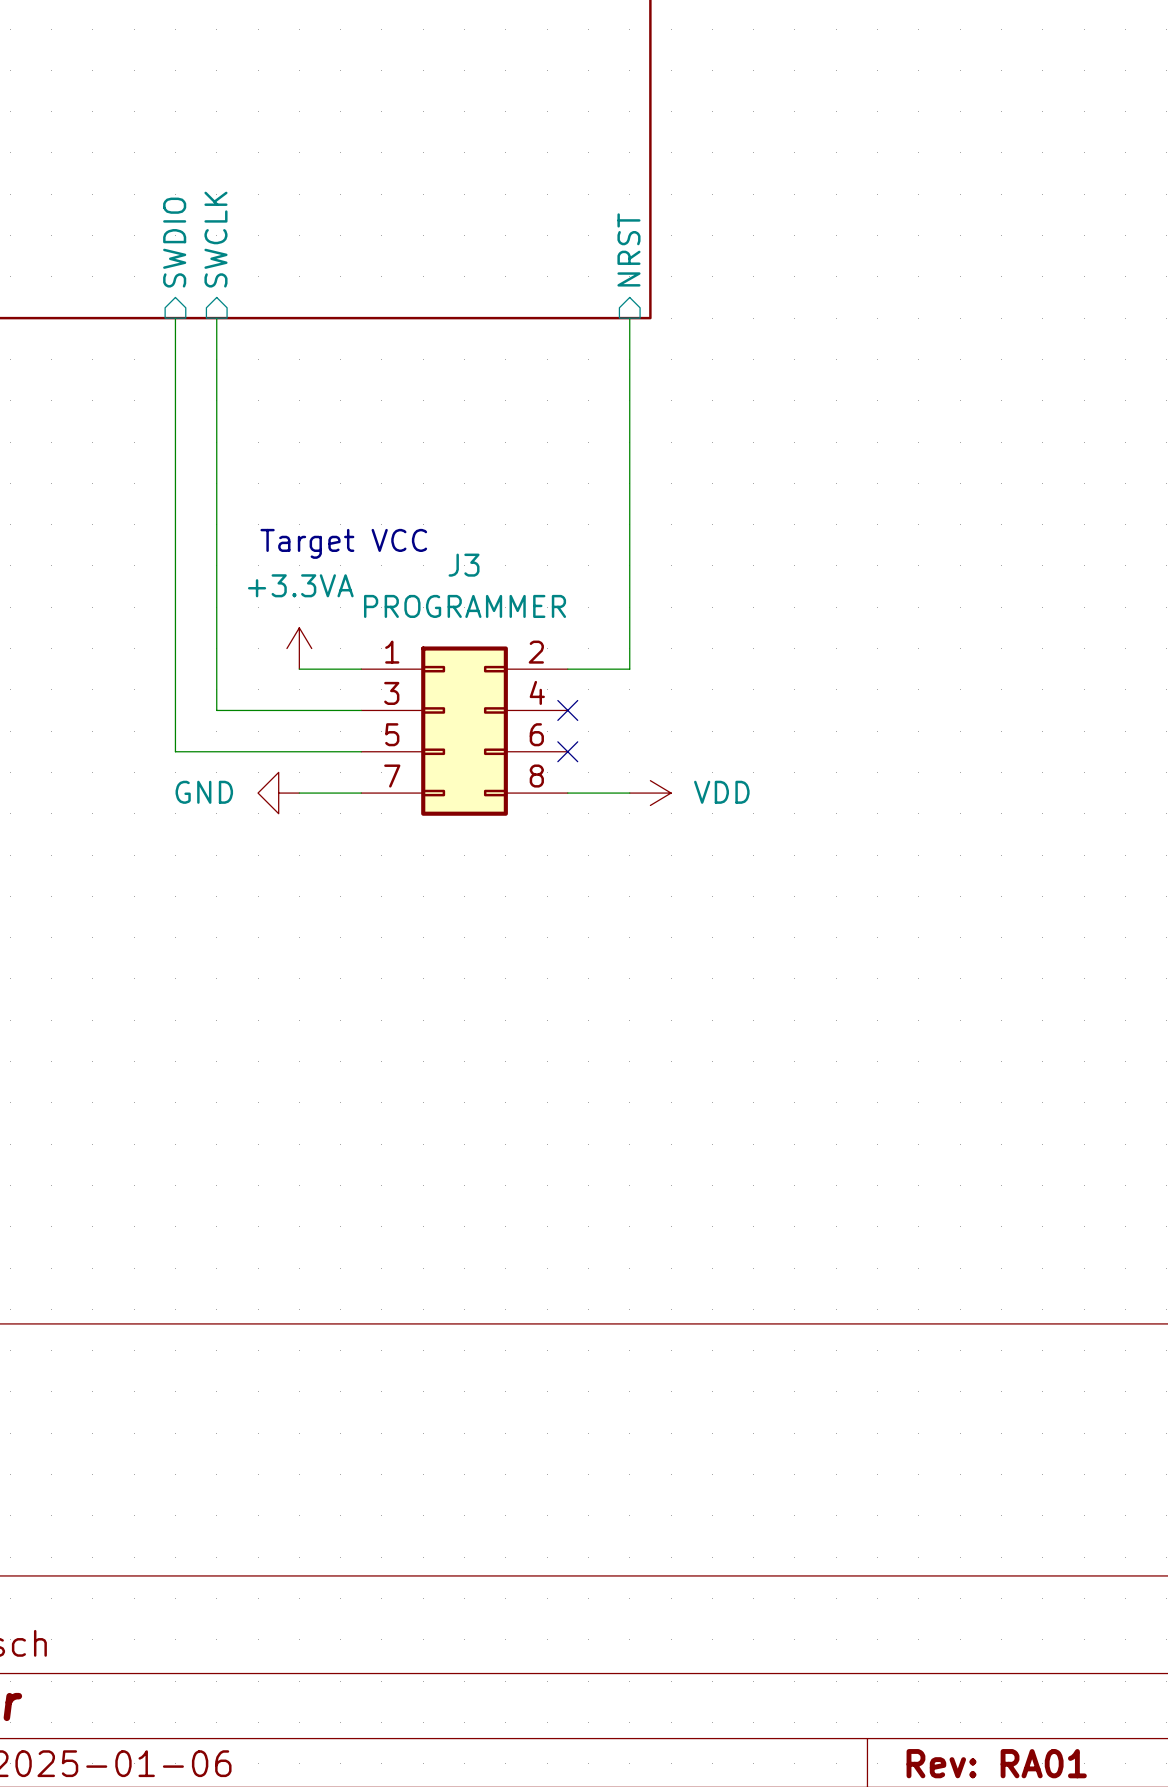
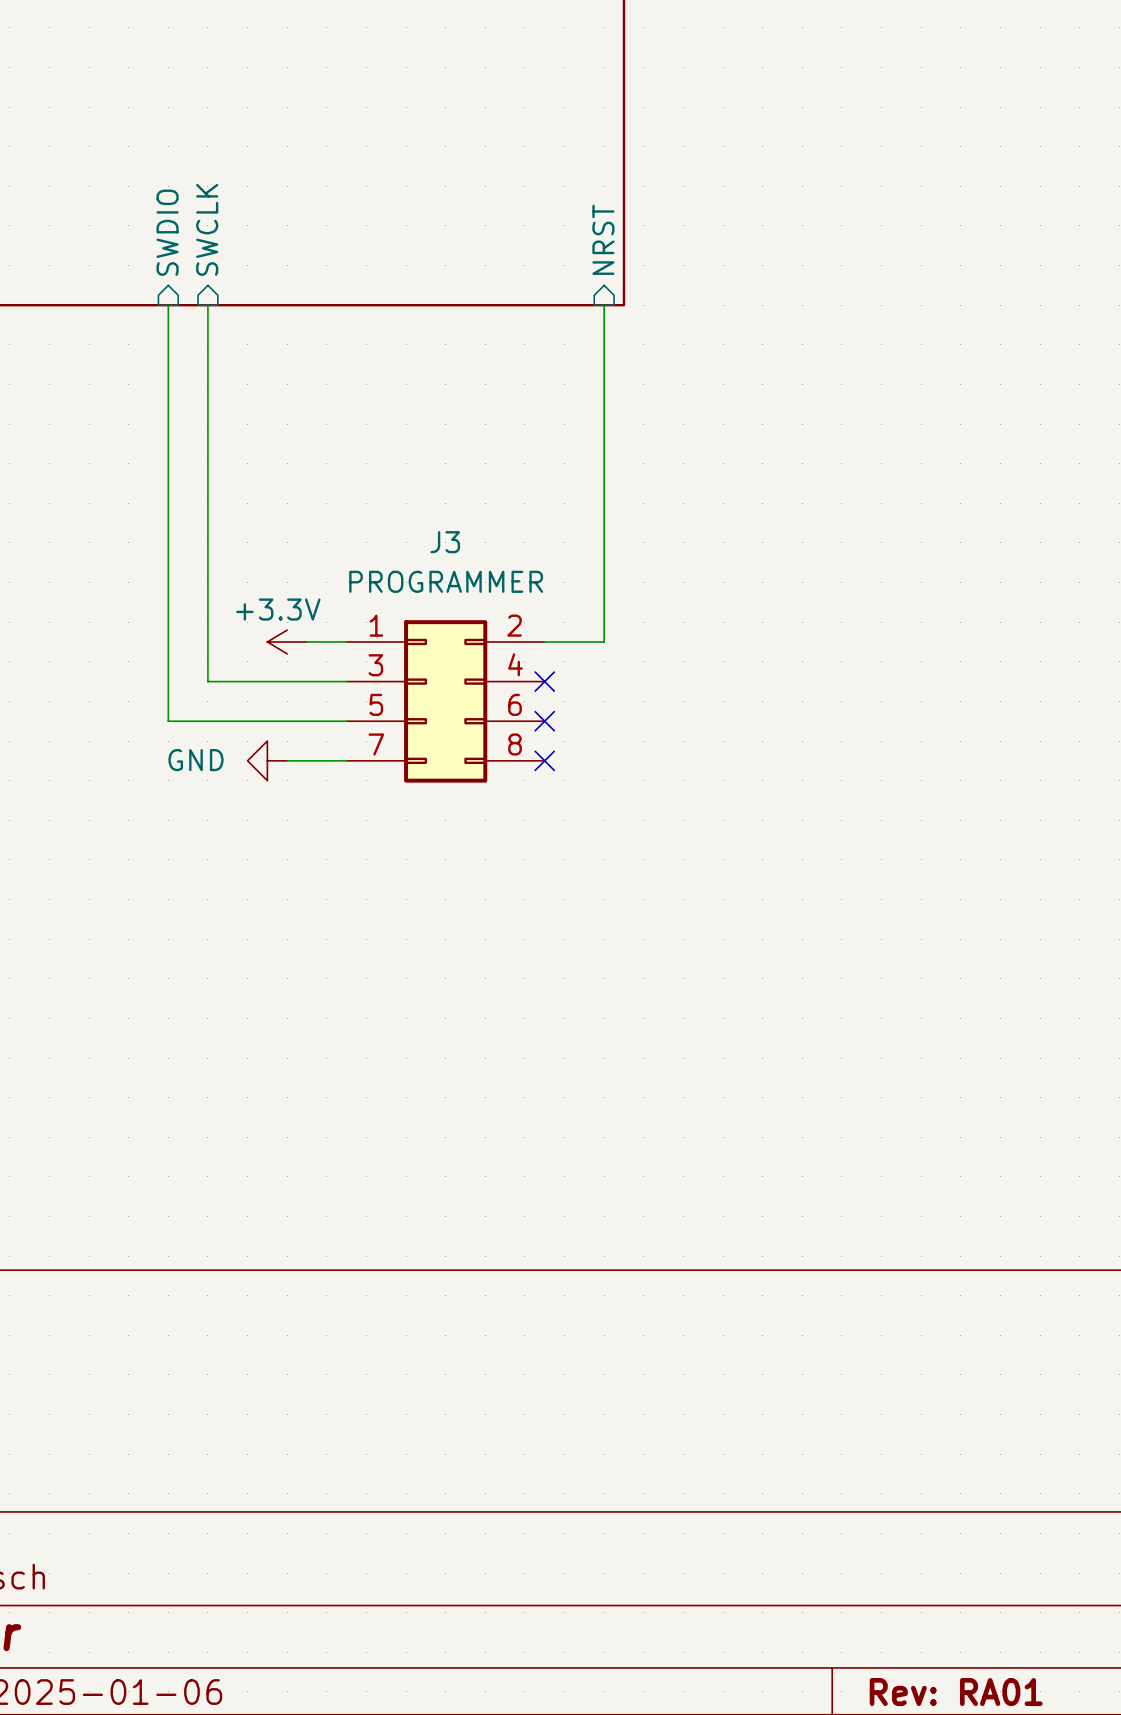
text: Target VCC (343, 543) -> none
power symbol: +3.3VA (299, 648) -> none
power symbol: none -> +3.3V (287, 641)
wire: (567, 793) (629, 793) -> none
no-connect mark: none -> (544, 760)
power symbol: VDD (650, 793) -> none

